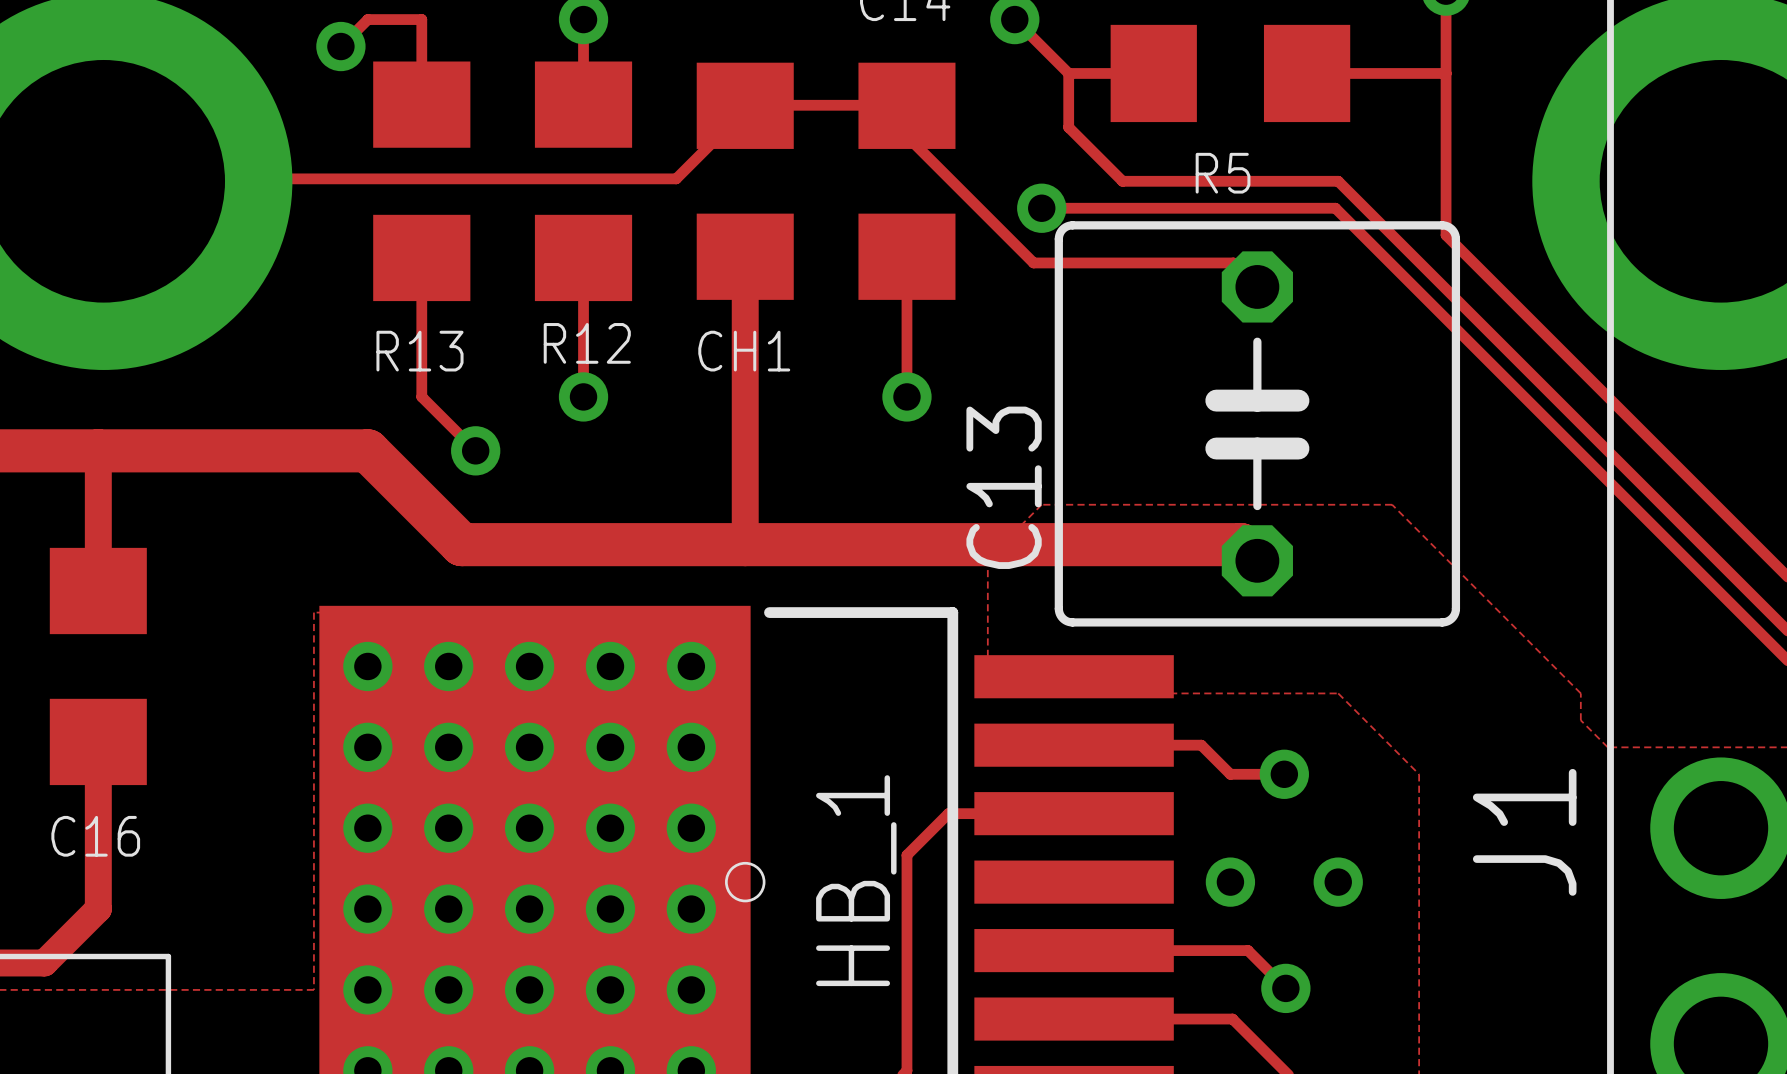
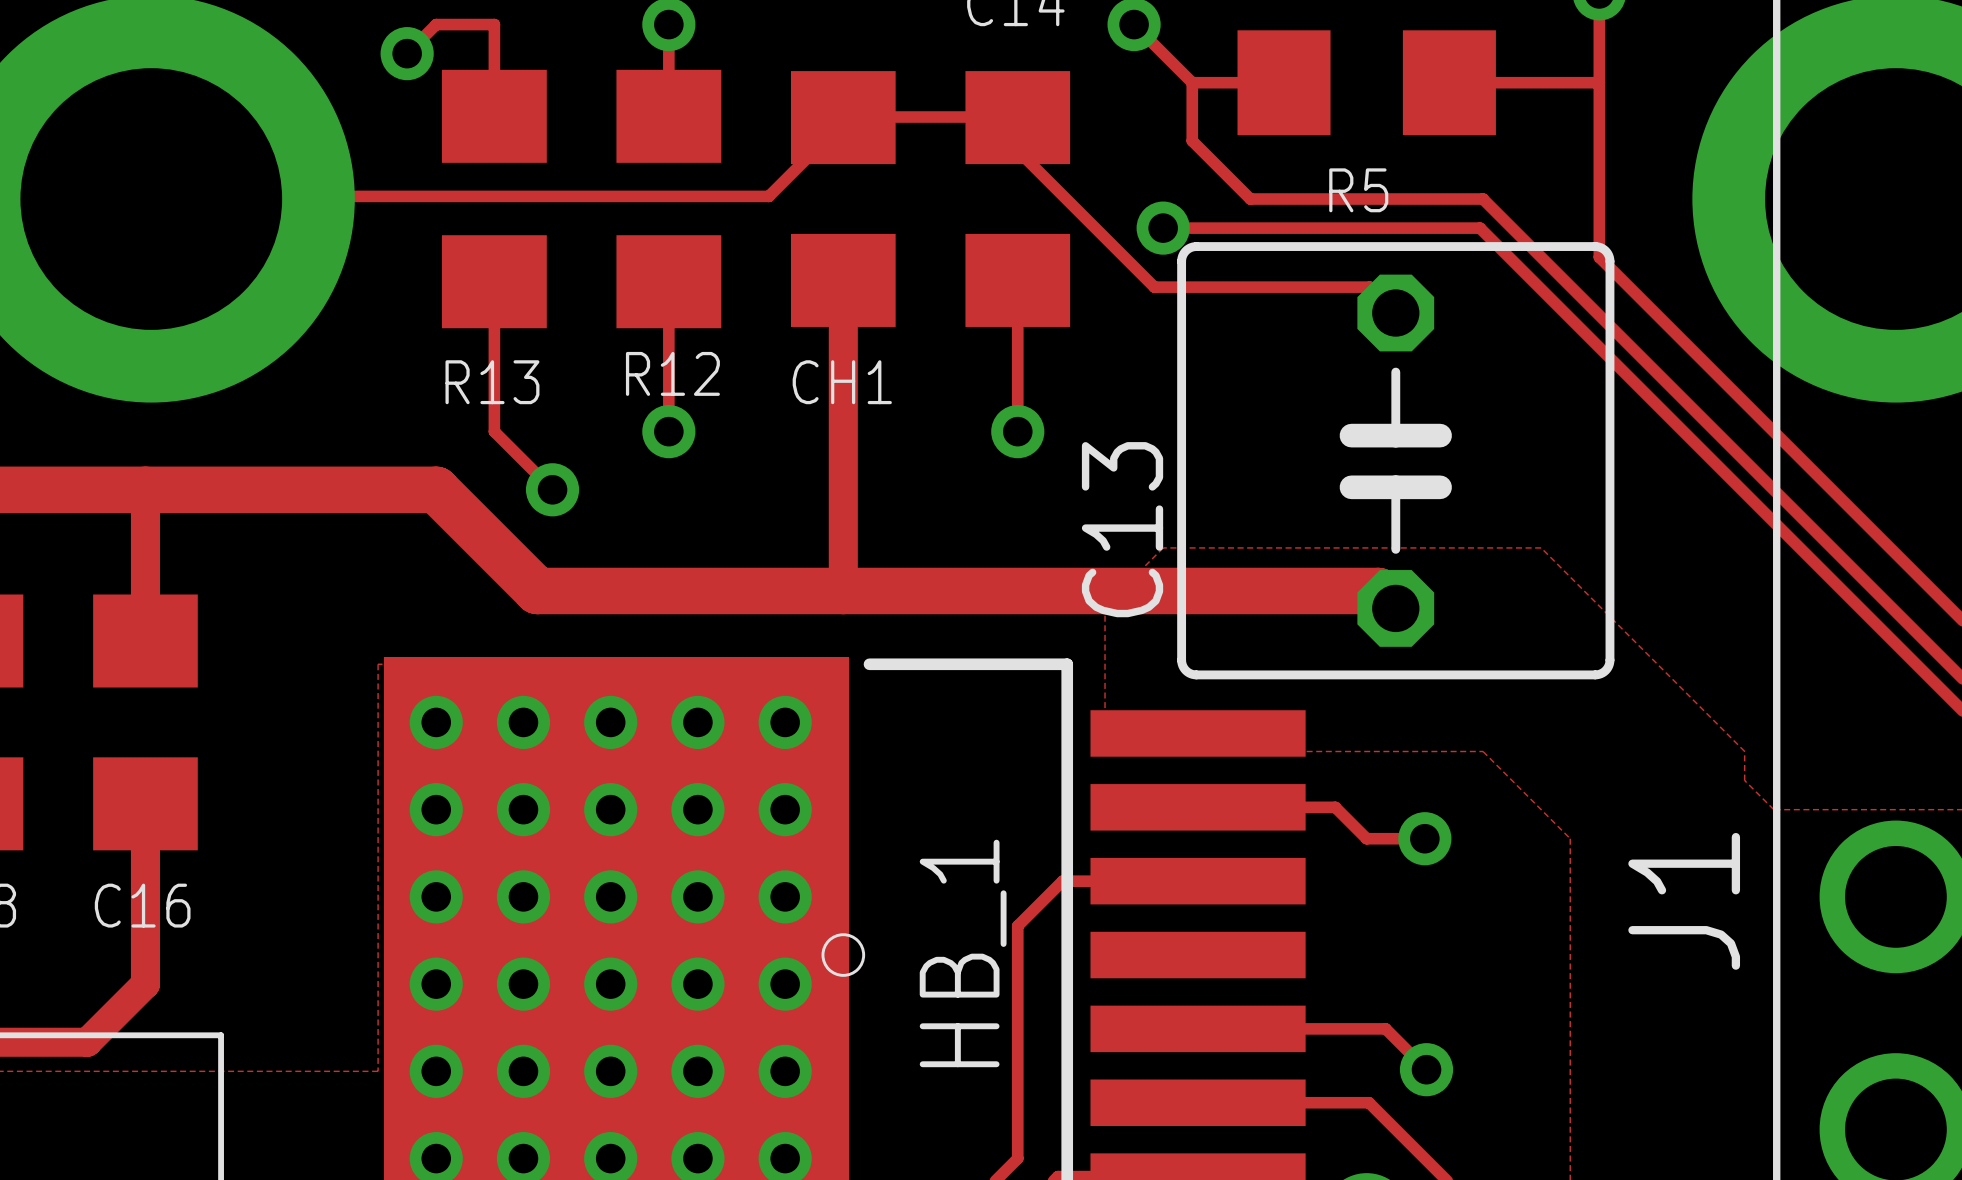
via: (1230, 882) -> none
via: (1338, 882) -> none

